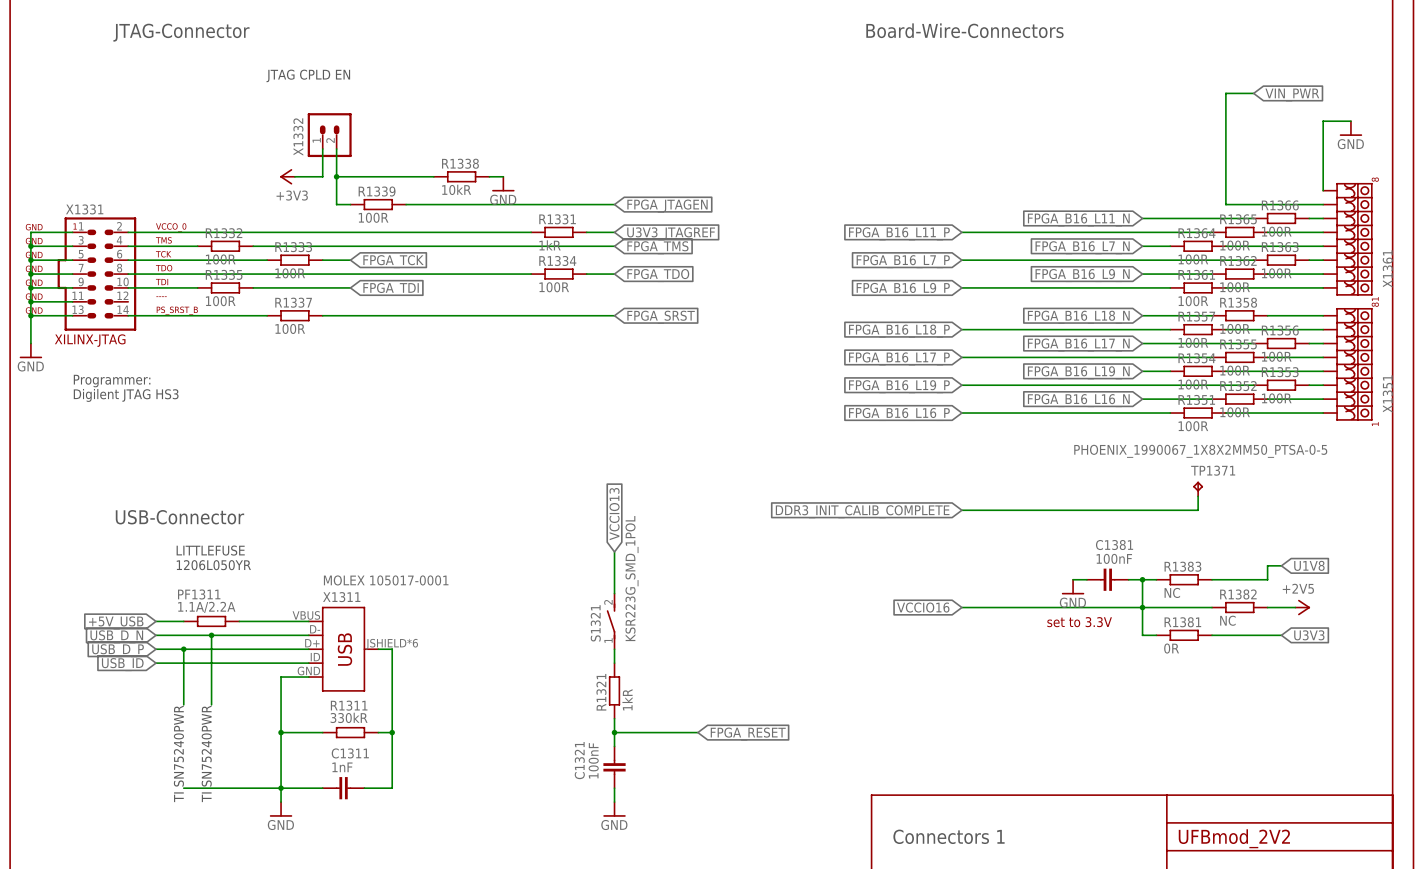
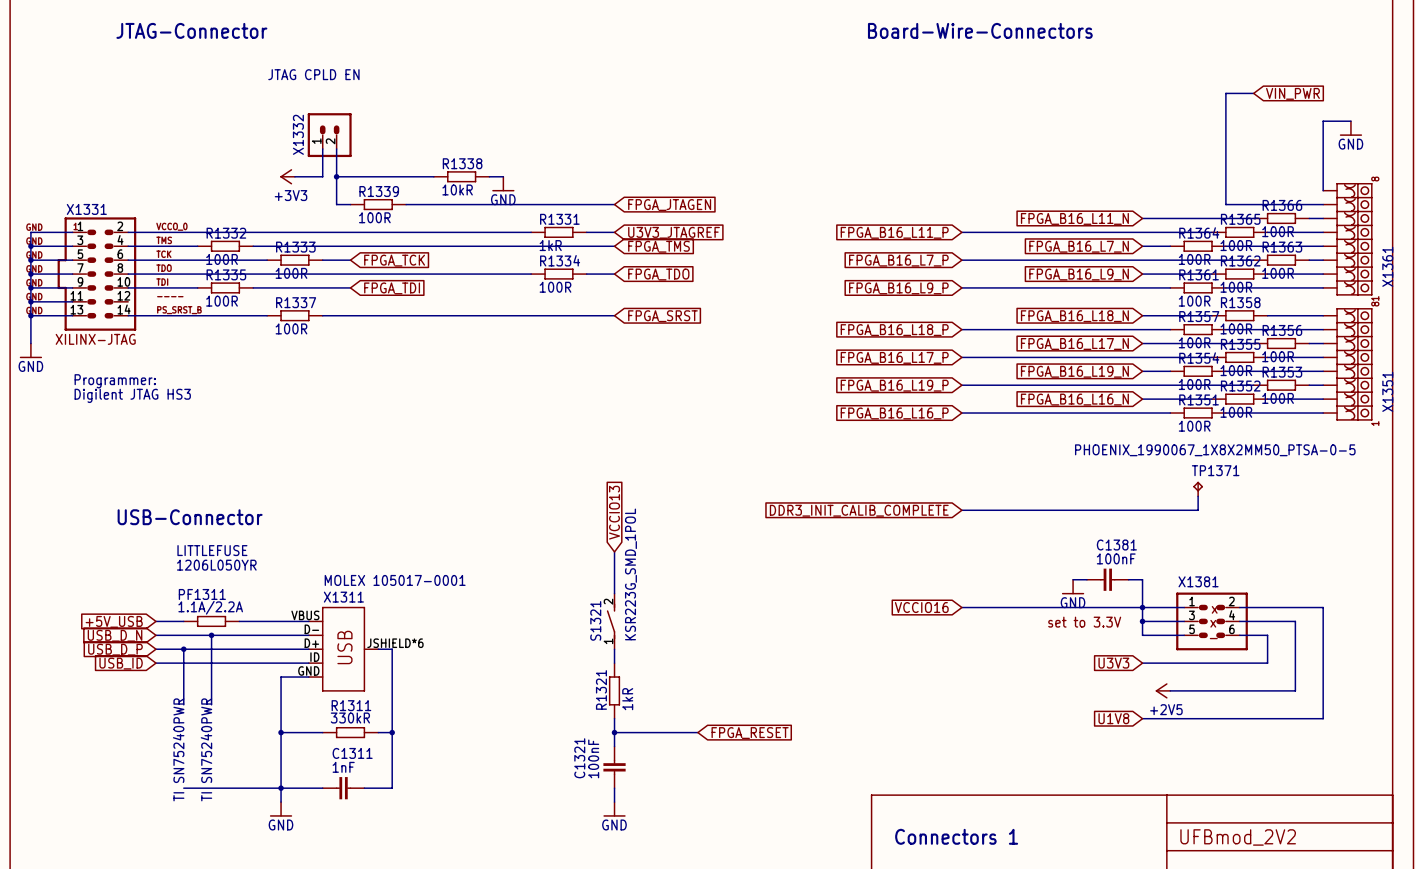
wire: (1281, 565) (1267, 565) (1267, 579) (1212, 579) -> none
global label: U1V8 (1309, 565) -> none
wire: (1142, 579) (1156, 579) -> none
junction: (1142, 579) -> none
R1383: NC (1184, 579) -> none
R1382: NC (1239, 607) -> none
wire: none -> (1295, 607) (1323, 607) (1323, 718) (1142, 718)
power symbol: +2V5 (1302, 607) -> none
text: none -> x (1214, 609)
wire: none -> (1142, 621) (1184, 621)
junction: none -> (1142, 621)
X1381: none -> (1212, 621)
wire: none -> (1239, 621) (1295, 621) (1295, 690) (1170, 690)
text: none -> x (1213, 623)
R1381: 0R (1184, 635) -> none
wire: (1267, 635) (1281, 635) -> (1267, 635) (1267, 663) (1142, 663)
global label: U3V3 (1309, 635) -> none
text: none -> - (1213, 638)
global label: none -> U3V3 (1113, 663)
power symbol: none -> +2V5 (1163, 690)
global label: none -> U1V8 (1113, 718)

